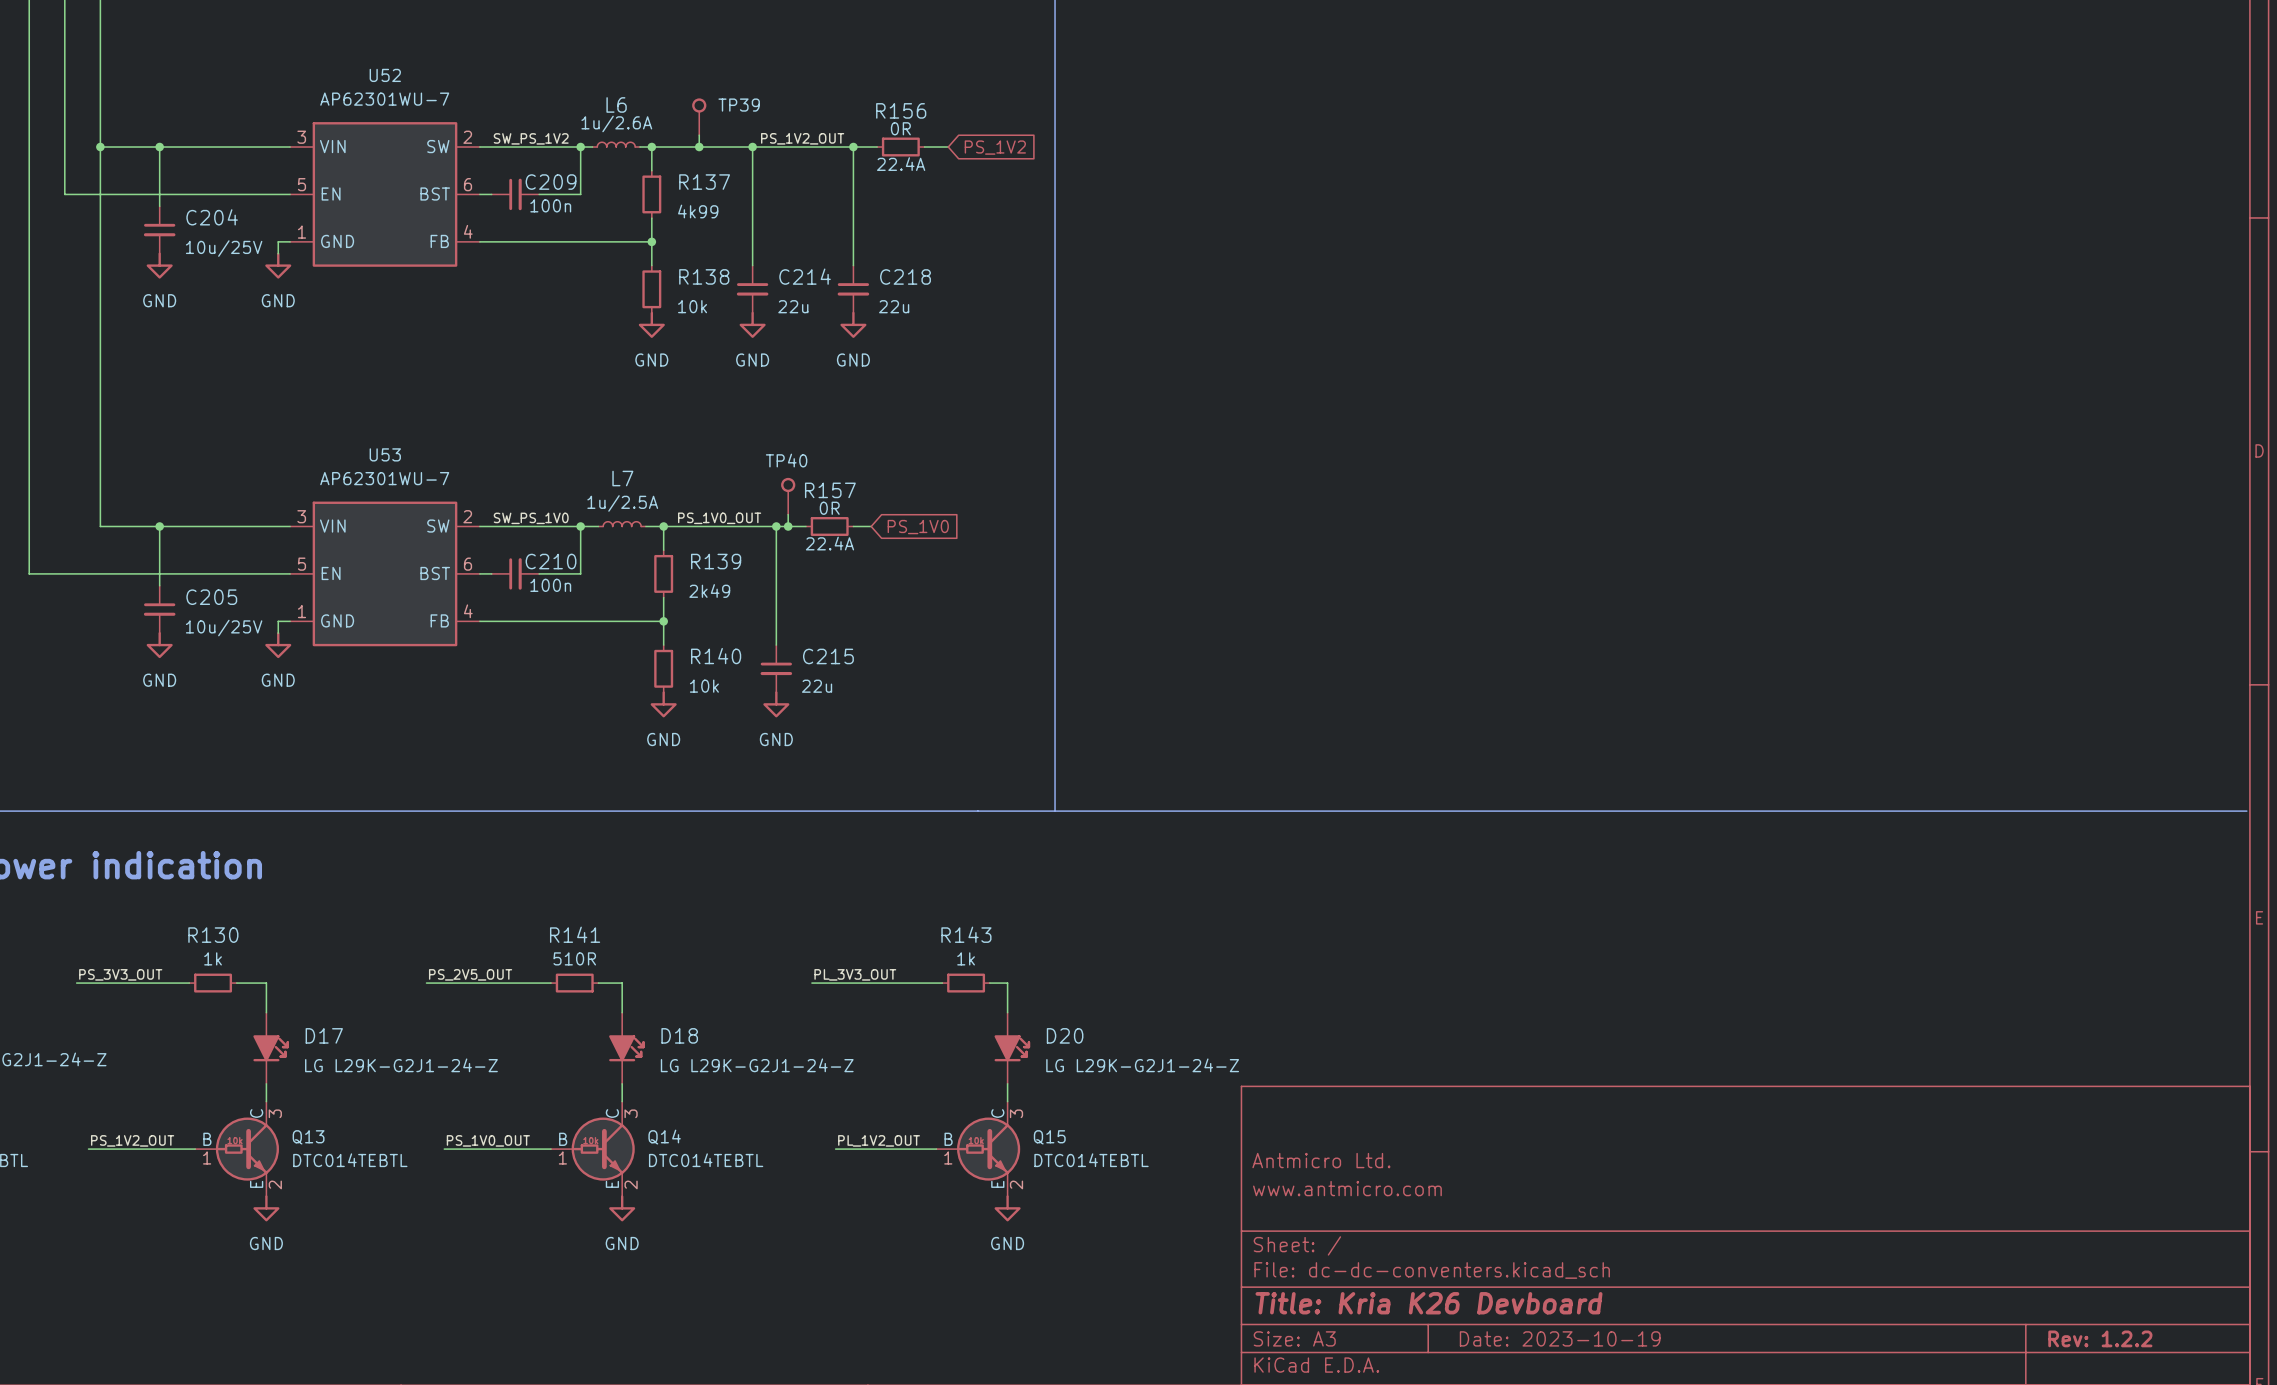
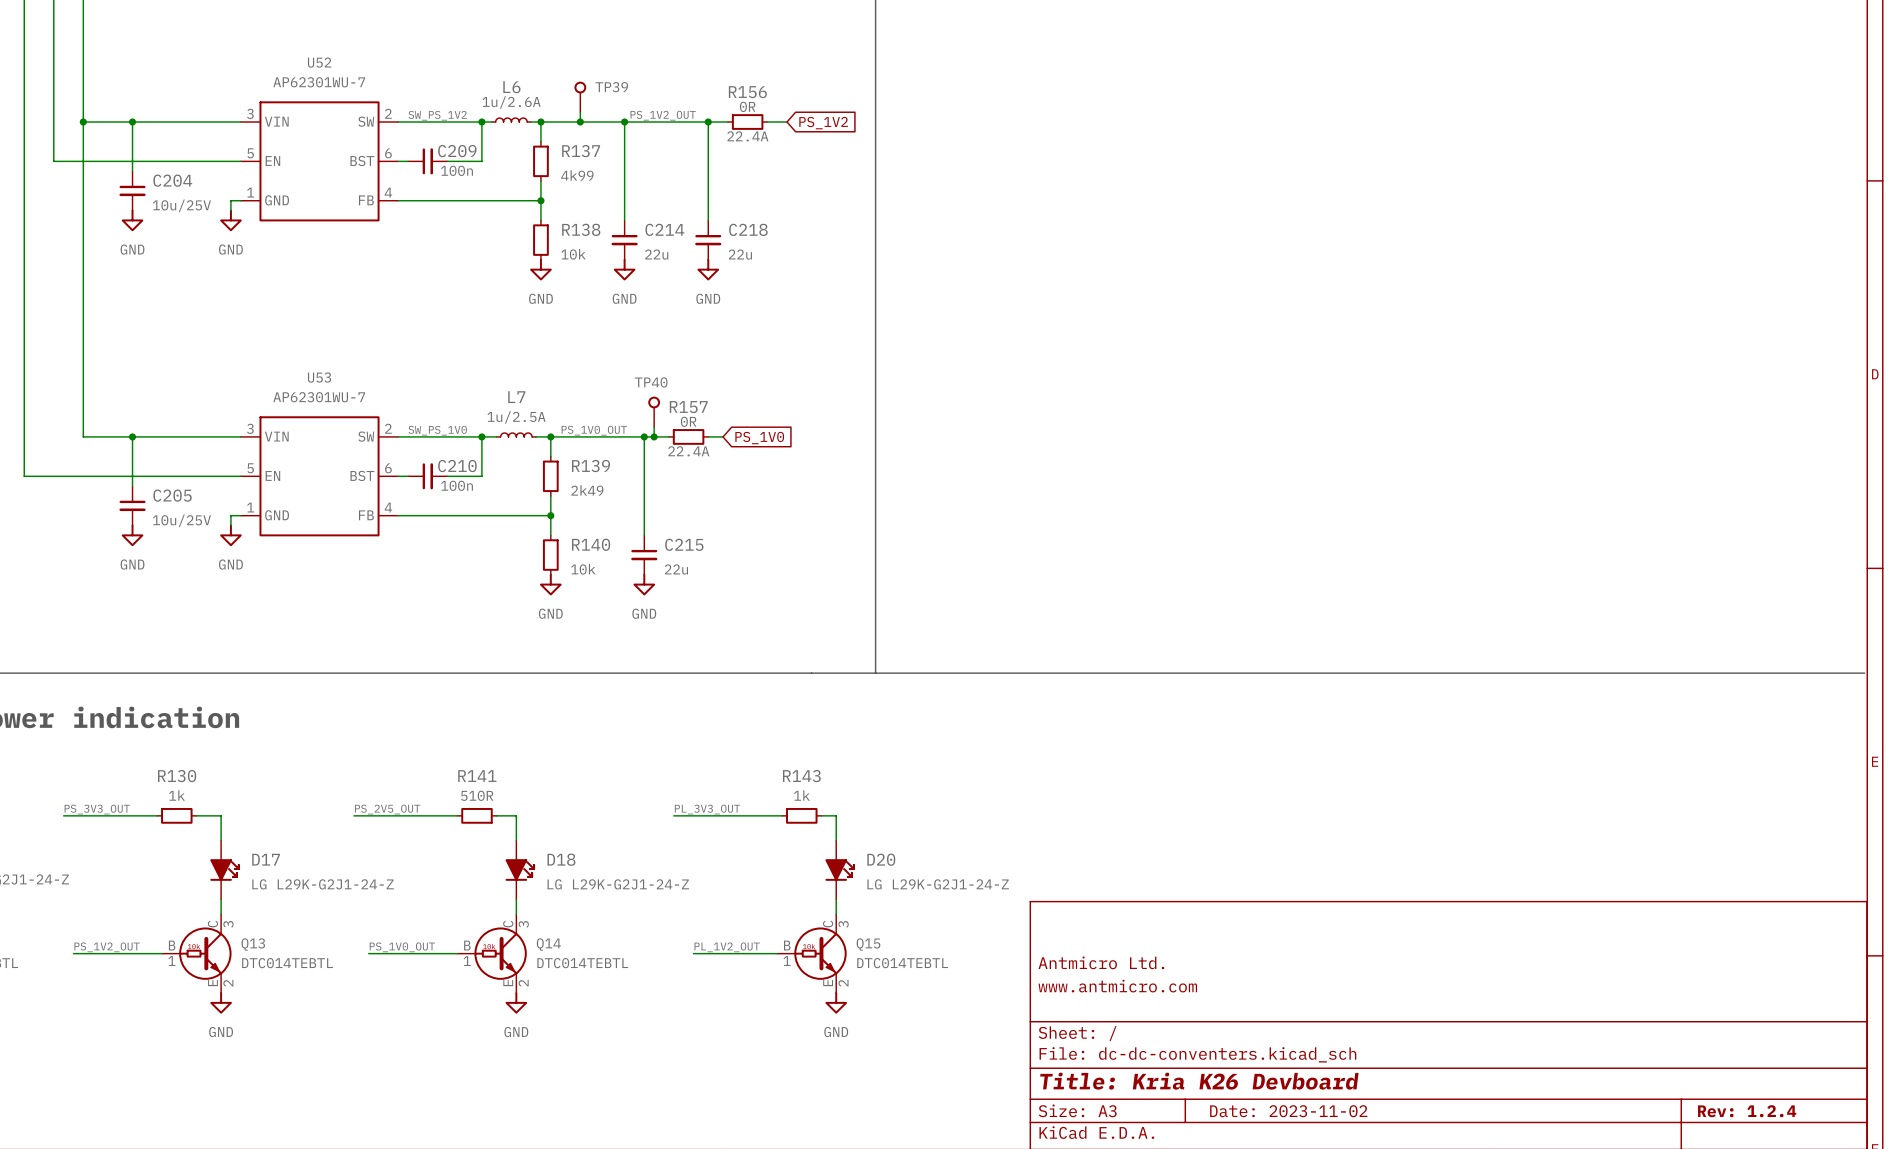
title block: Date: 2023-10-19 (1560, 1338) -> Date: 2023-11-02 (1288, 1111)
title block: Rev: 1.2.2 (2100, 1338) -> Rev: 1.2.4 (1747, 1111)

